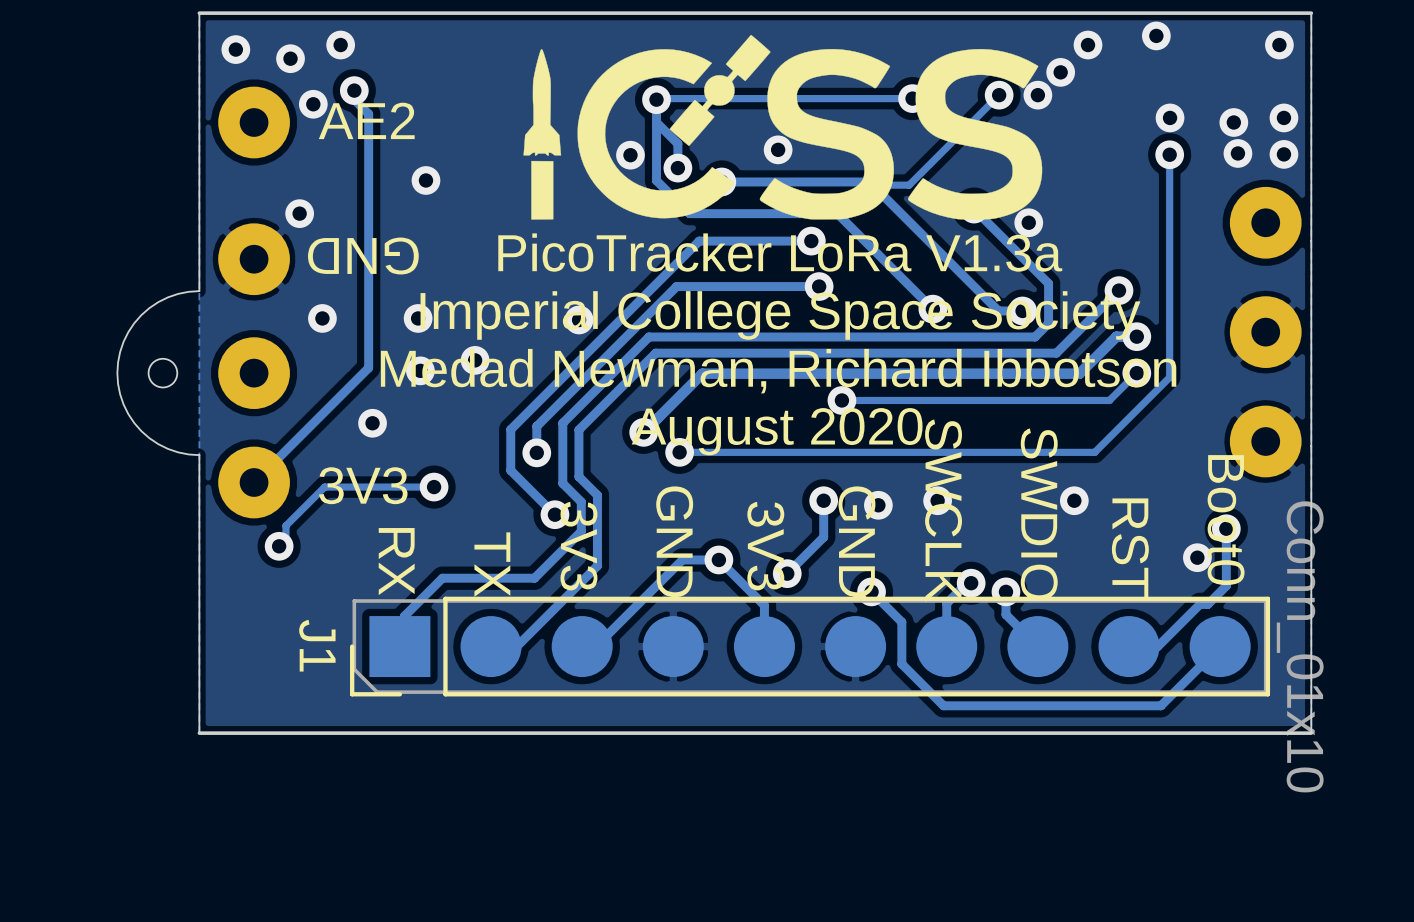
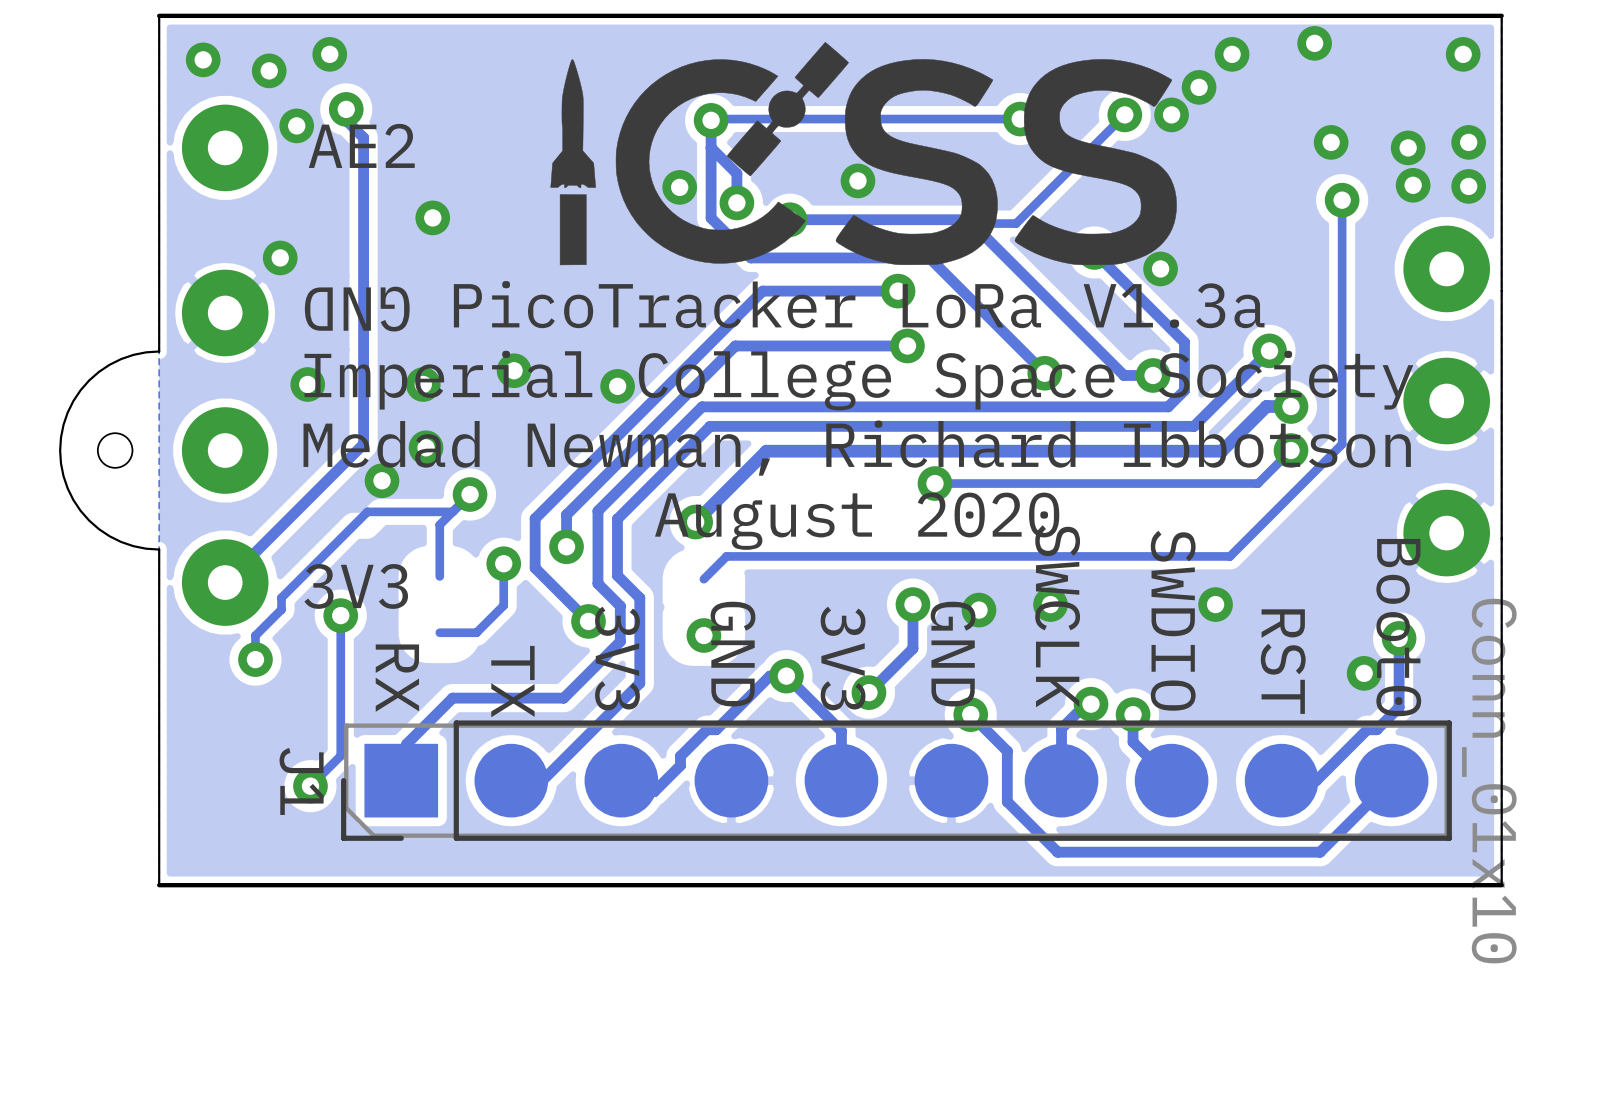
track: (1169, 154) (1169, 377) -> (1342, 200) (1342, 444) (1330, 455)
via position: (1169, 154) -> (1342, 200)
via: none -> (514, 370)
via: (475, 360) -> none
track: none -> (470, 494) (439, 524) (439, 576)
via: none -> (470, 494)
via position: (372, 423) -> (382, 480)
via position: (679, 452) -> (703, 635)
track: (1094, 452) (679, 452) -> (1240, 546) (1229, 556) (726, 556) (703, 579)
track: none -> (503, 563) (503, 605) (476, 632) (439, 632)
via: none -> (503, 563)
track: (434, 487) (324, 487) (285, 525) (285, 539) (279, 546) -> (452, 511) (367, 511) (281, 597) (281, 609) (255, 635) (255, 659)
via: (434, 487) -> none
track: none -> (340, 615) (340, 755) (310, 786)
via: none -> (340, 615)
track: (705, 559) (682, 559) (586, 655) -> (769, 676) (716, 729) (706, 729) (680, 756) (680, 765) (654, 791) (626, 791)
via: none -> (310, 786)

